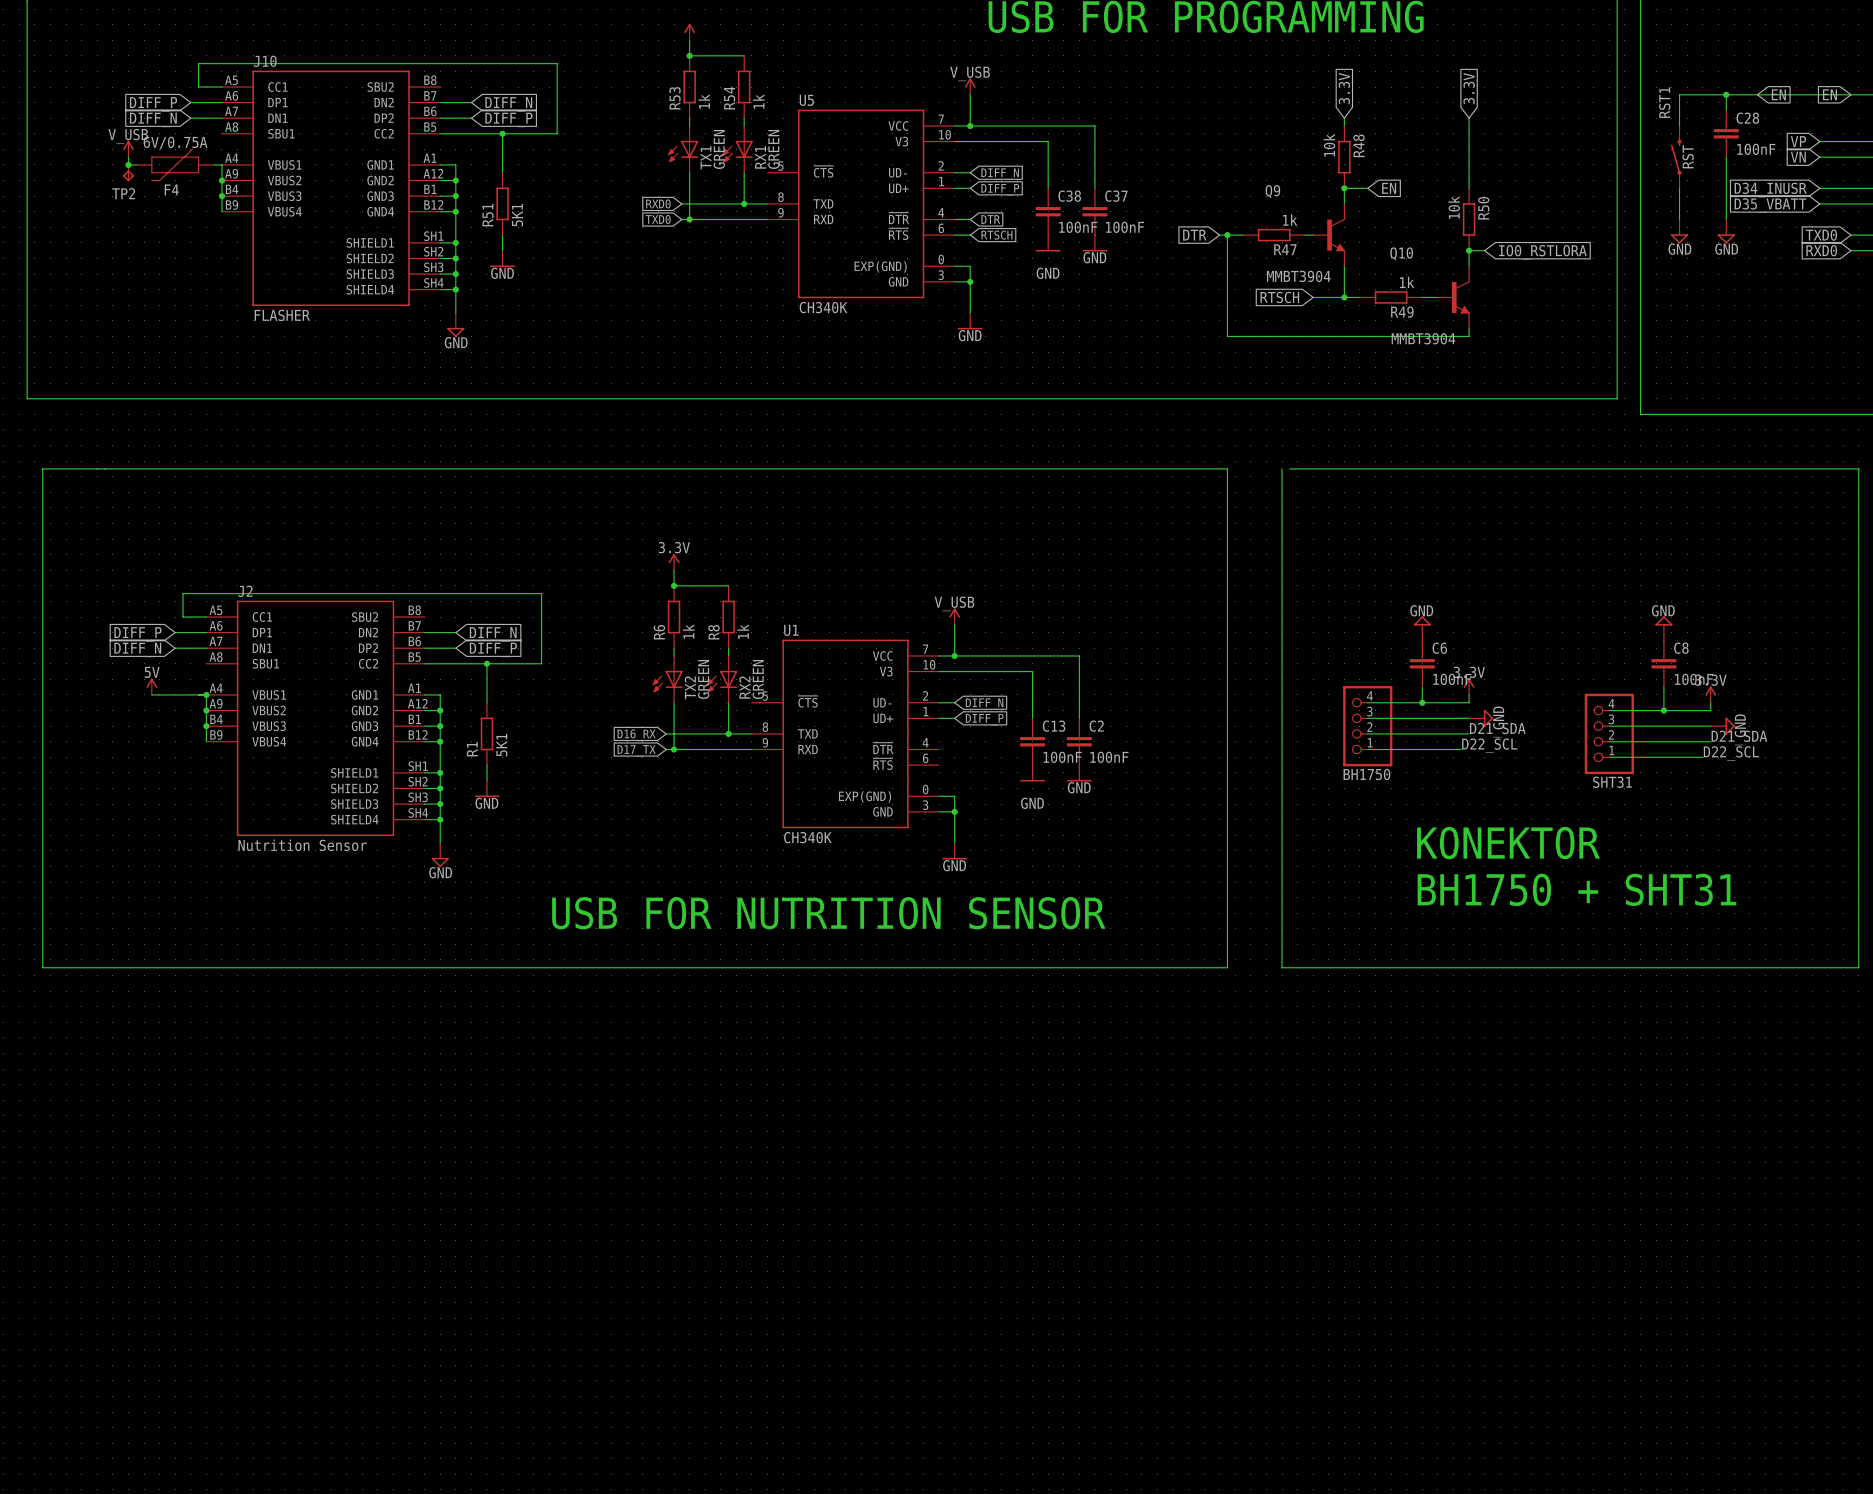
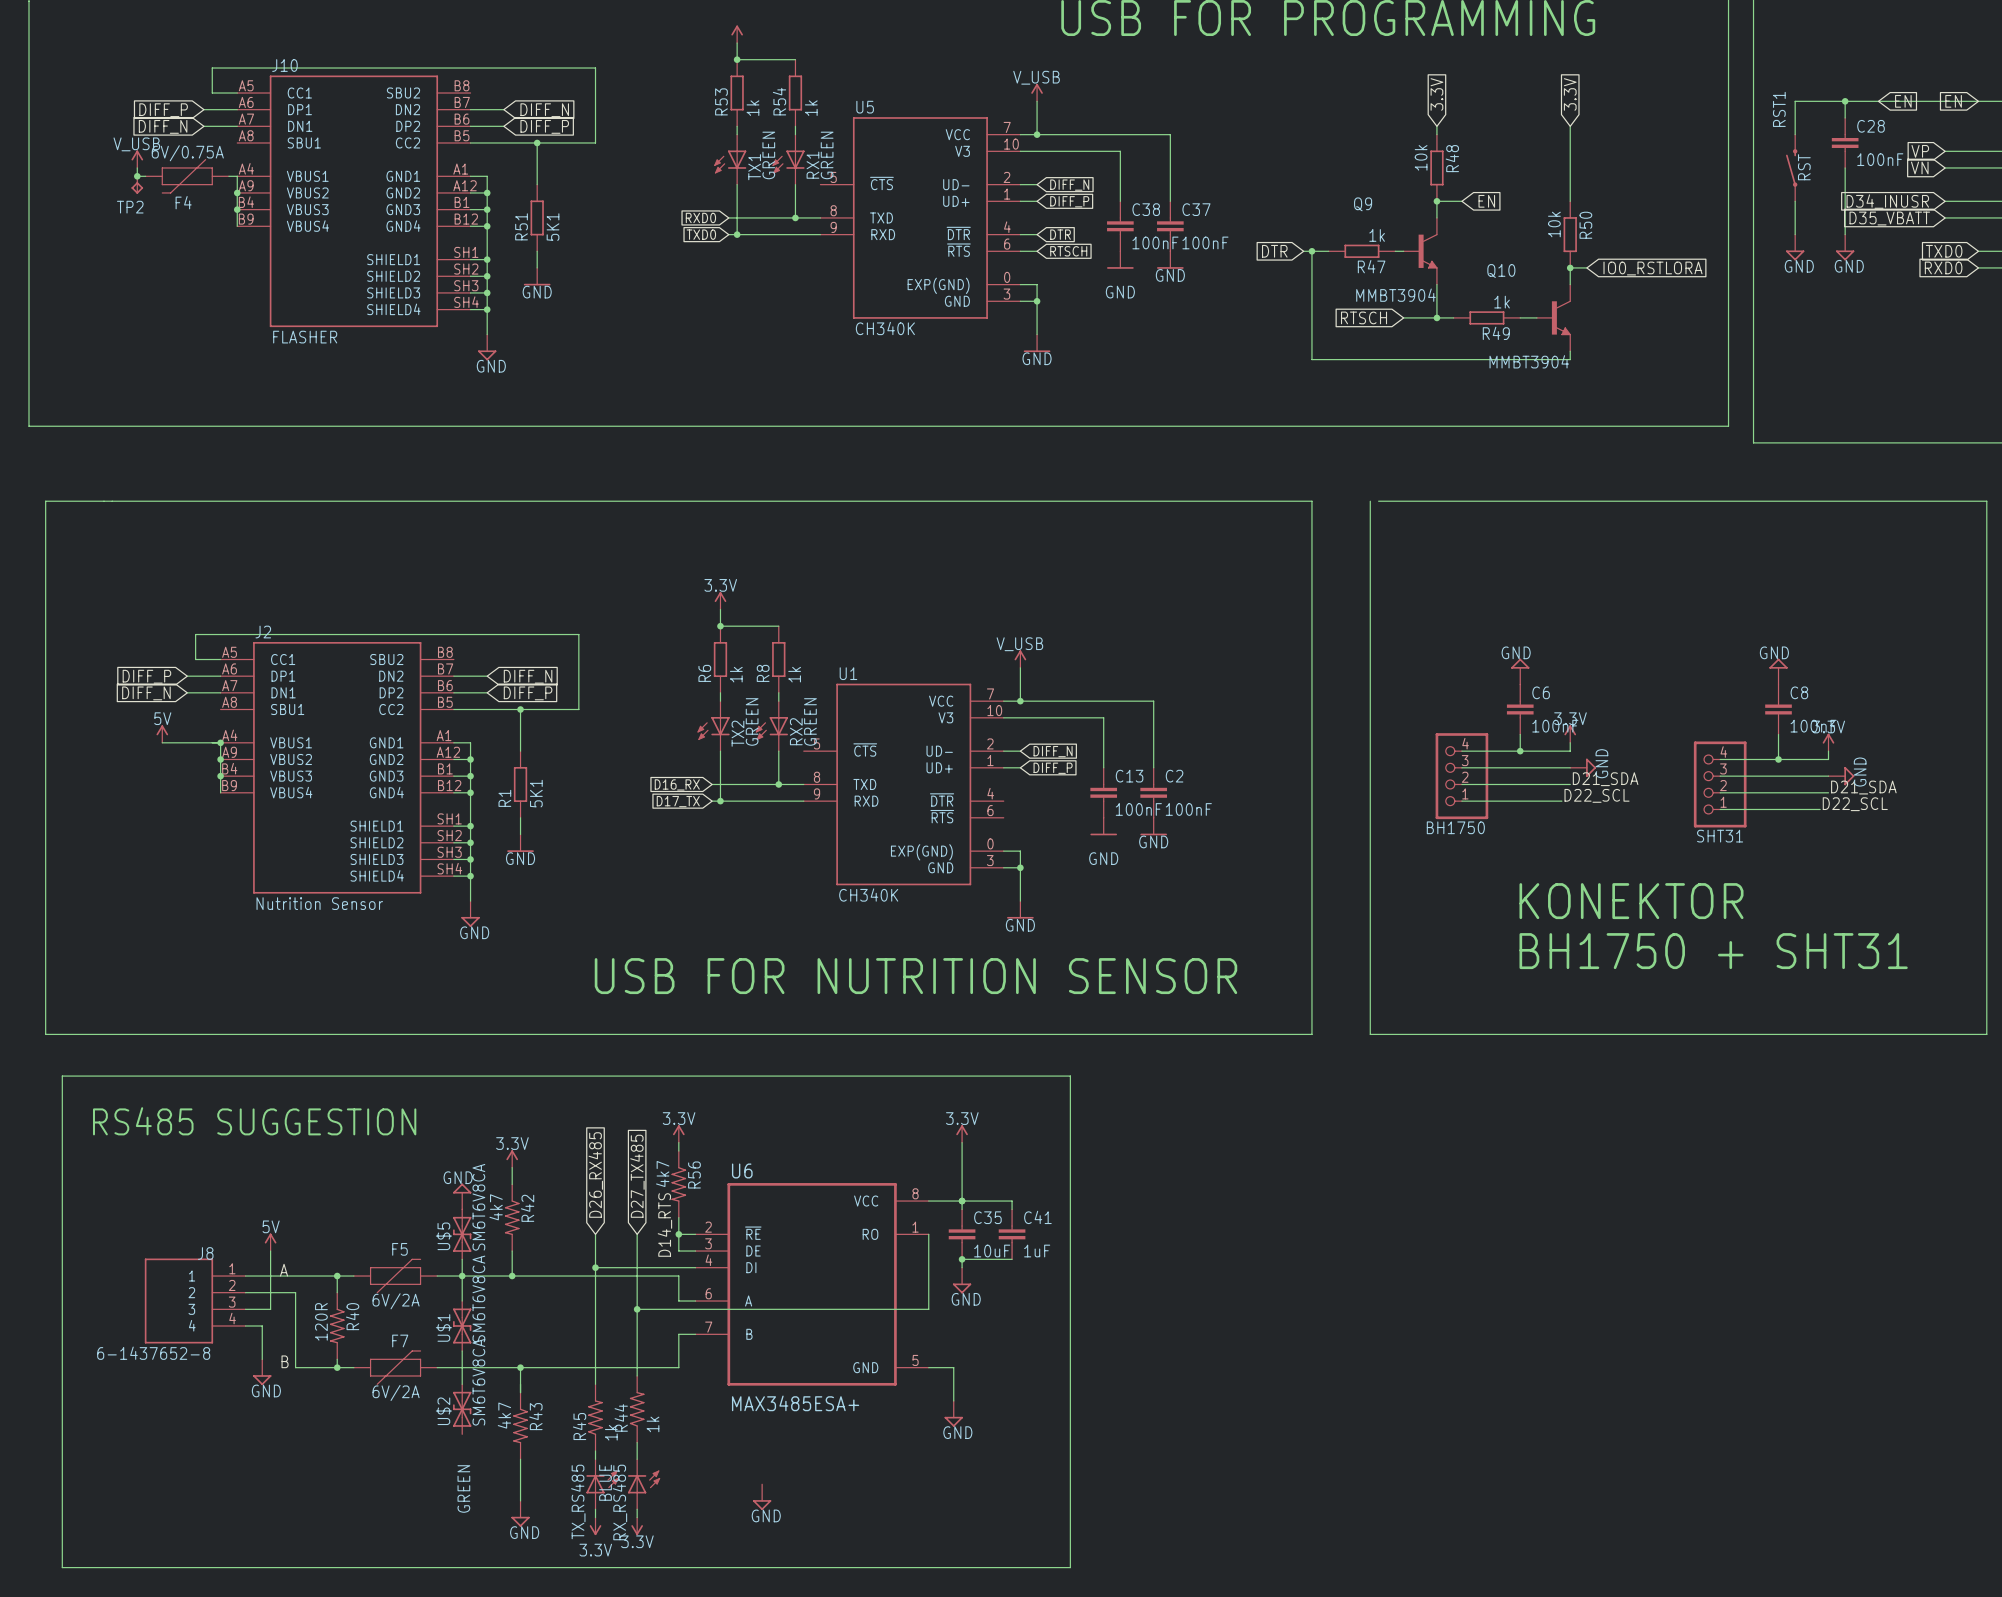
wire: none -> (62, 1076) (62, 1567) (1070, 1567) (1070, 1076) (62, 1076)
text: none -> RS485 SUGGESTION (254, 1121)
power symbol: none -> 3.3V (678, 1133)
power symbol: none -> 3.3V (962, 1133)
wire: none -> (678, 1142) (678, 1151)
wire: none -> (962, 1142) (962, 1209)
power symbol: none -> 3.3V (512, 1158)
wire: none -> (512, 1167) (512, 1184)
global label: none -> D26_RX485 (595, 1175)
global label: none -> D27_TX485 (637, 1176)
R56: none -> 4k7 (678, 1184)
power symbol: none -> GND (462, 1196)
wire: none -> (928, 1201) (1012, 1201) (1012, 1209)
junction: none -> (962, 1201)
R42: none -> 4k7 (512, 1217)
wire: none -> (678, 1217) (678, 1251) (695, 1251)
label: none -> D14_RTS (664, 1224)
U$5: none -> SM6T6V8CA (462, 1234)
wire: none -> (595, 1234) (595, 1384)
wire: none -> (637, 1234) (637, 1375)
wire: none -> (678, 1234) (695, 1234)
junction: none -> (678, 1234)
wire: none -> (928, 1234) (928, 1309) (637, 1309)
C35: none -> 10uF (962, 1234)
C41: none -> 1uF (1012, 1234)
power symbol: none -> 5V (270, 1242)
wire: none -> (270, 1251) (270, 1309) (245, 1309)
wire: none -> (512, 1251) (512, 1276)
wire: none -> (462, 1259) (462, 1301)
junction: none -> (962, 1259)
wire: none -> (1012, 1259) (962, 1259) (962, 1267)
wire: none -> (595, 1267) (695, 1267)
junction: none -> (595, 1267)
label: none -> A (284, 1270)
wire: none -> (245, 1276) (353, 1276)
wire: none -> (337, 1276) (337, 1292)
junction: none -> (337, 1276)
F5: none -> 6V/2A (395, 1276)
wire: none -> (437, 1276) (678, 1276) (678, 1301) (695, 1301)
junction: none -> (462, 1276)
junction: none -> (512, 1276)
power symbol: none -> GND (962, 1280)
U6: none -> MAX3485ESA+ (812, 1284)
wire: none -> (245, 1292) (295, 1292) (295, 1367) (353, 1367)
J8: none -> 6-1437652-8 (195, 1301)
junction: none -> (637, 1309)
wire: none -> (245, 1325) (262, 1325) (262, 1359)
R40: none -> 120R (337, 1325)
U$1: none -> SM6T6V8CA (462, 1325)
wire: none -> (695, 1334) (678, 1334) (678, 1367) (437, 1367)
wire: none -> (462, 1350) (462, 1384)
wire: none -> (337, 1359) (337, 1367)
label: none -> B (285, 1361)
junction: none -> (337, 1367)
F7: none -> 6V/2A (395, 1367)
wire: none -> (520, 1367) (520, 1392)
junction: none -> (520, 1367)
wire: none -> (928, 1367) (953, 1367) (953, 1400)
power symbol: none -> GND (262, 1372)
U$2: none -> SM6T6V8CA (462, 1409)
R44: none -> 1k (637, 1409)
power symbol: none -> GND (953, 1413)
R45: none -> 1k (595, 1417)
R43: none -> 4k7 (520, 1425)
wire: none -> (637, 1442) (637, 1459)
wire: none -> (595, 1450) (595, 1459)
wire: none -> (520, 1459) (520, 1500)
TX_RS485: none -> GREEN (602, 1484)
RX_RS485: none -> BLUE (644, 1484)
power symbol: none -> GND (762, 1497)
wire: none -> (595, 1509) (595, 1517)
wire: none -> (637, 1509) (637, 1517)
power symbol: none -> GND (520, 1513)
power symbol: none -> 3.3V (595, 1526)
power symbol: none -> 3.3V (637, 1526)

